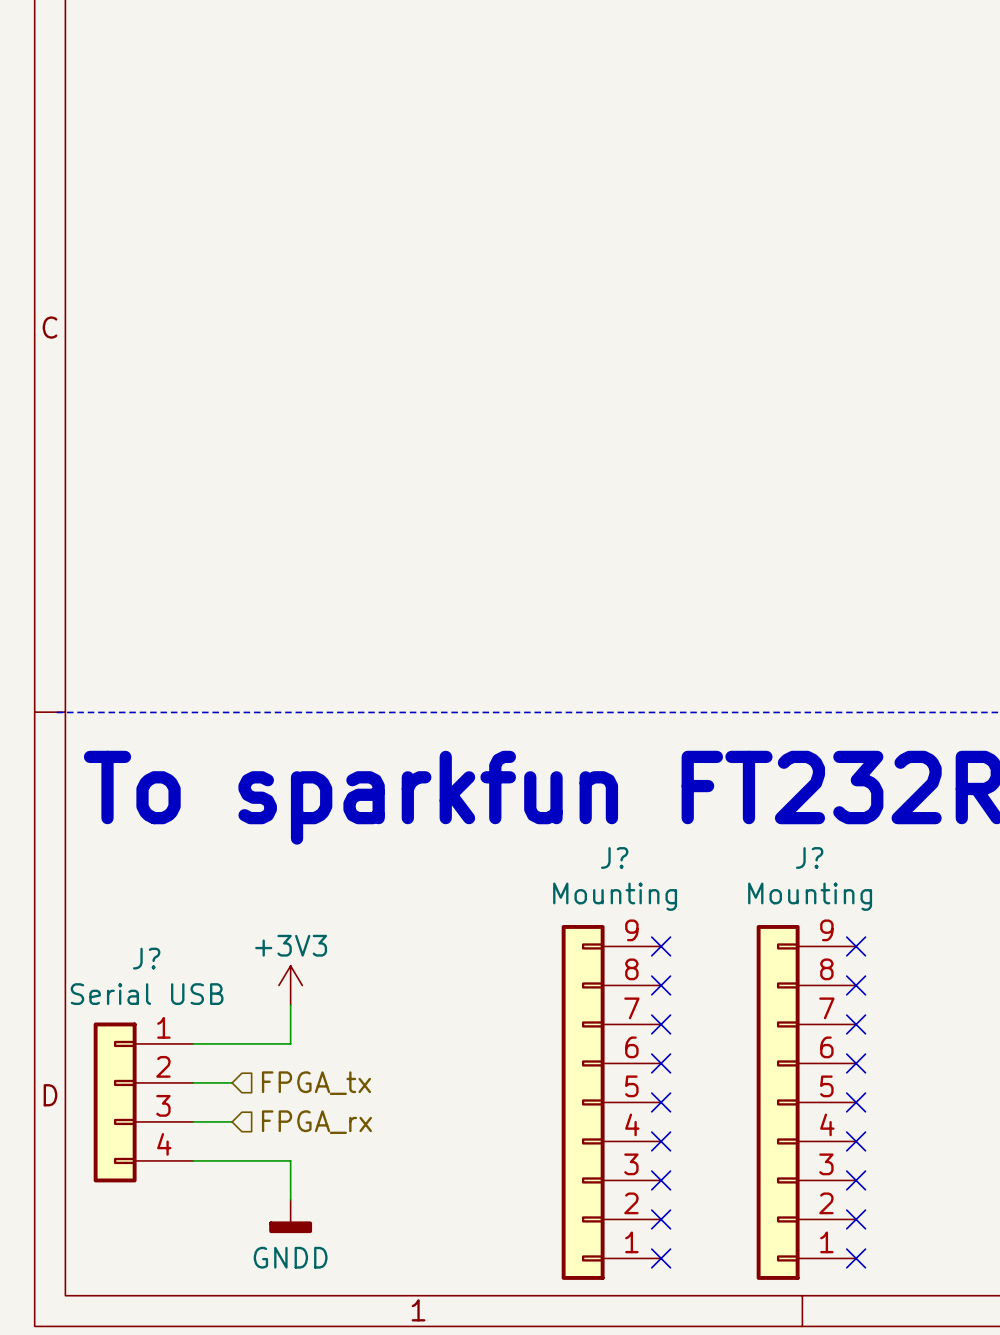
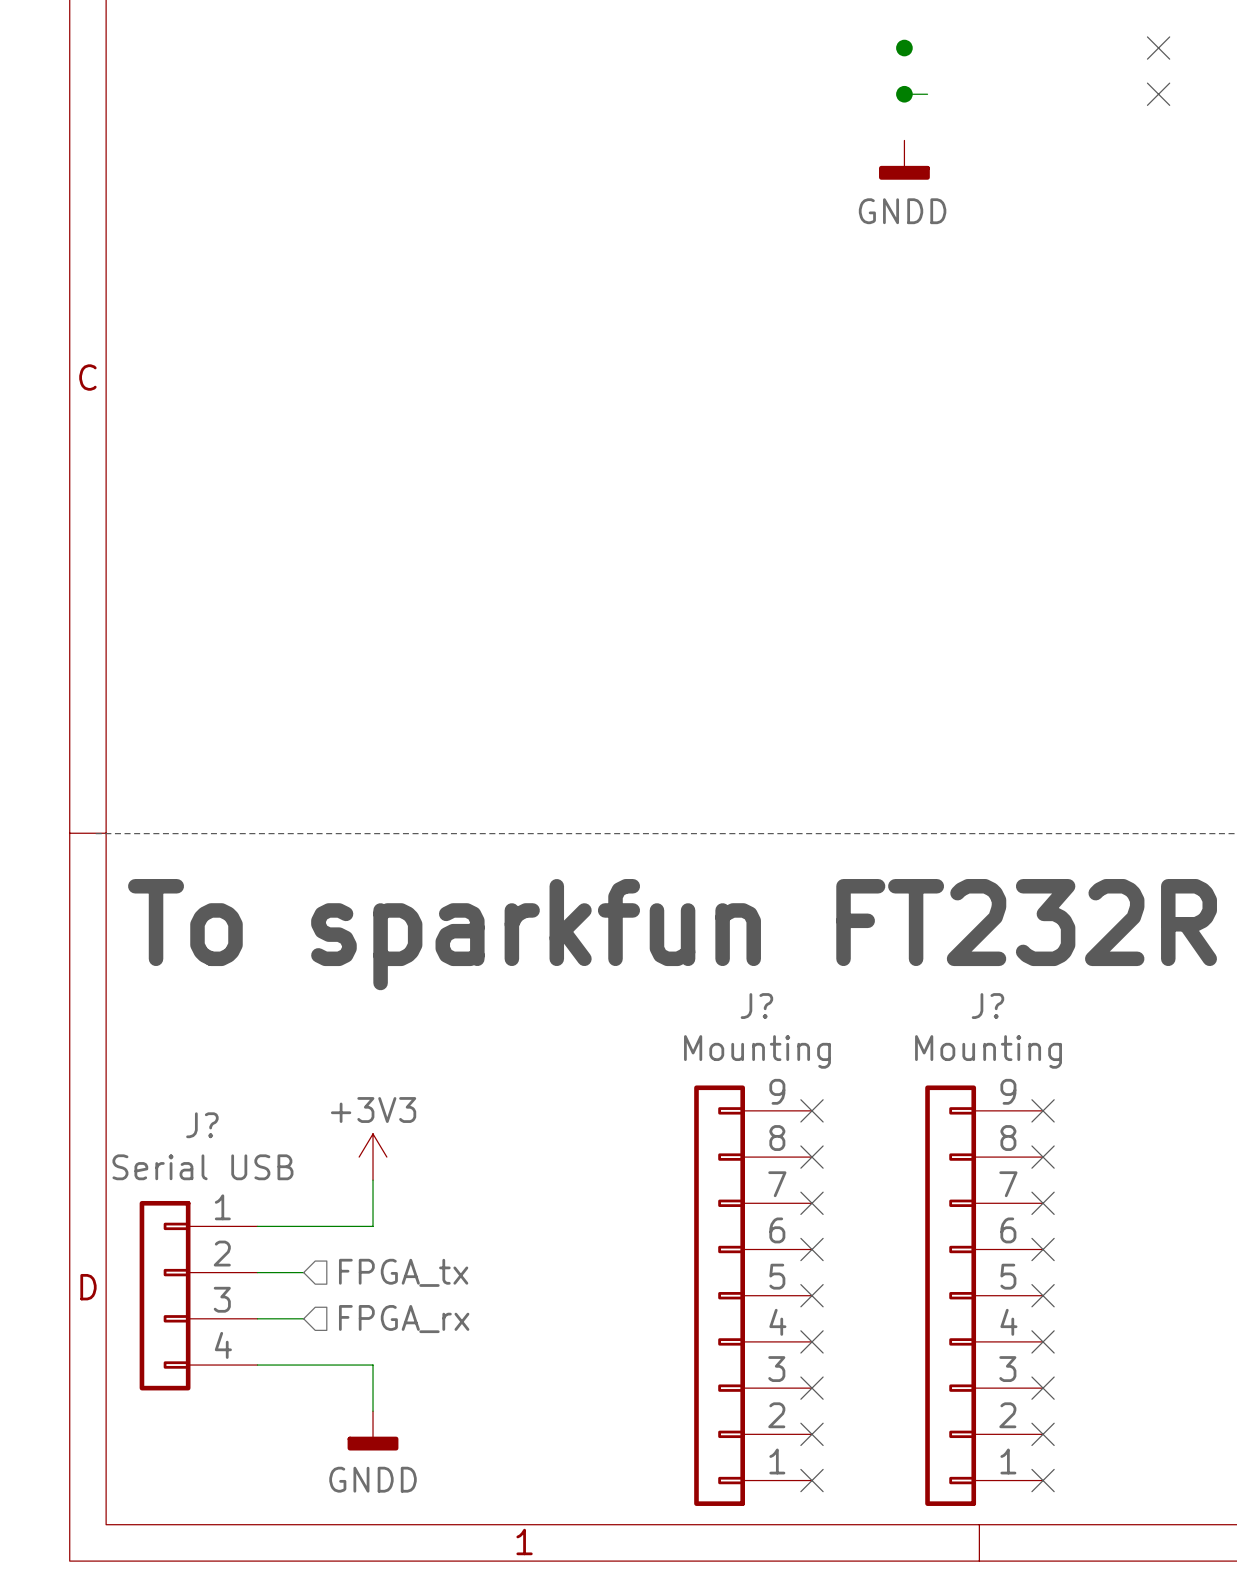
junction: none -> (904, 48)
no-connect mark: none -> (1158, 48)
wire: none -> (904, 94) (927, 94)
junction: none -> (904, 94)
no-connect mark: none -> (1158, 94)
power symbol: none -> GNDD (904, 160)

